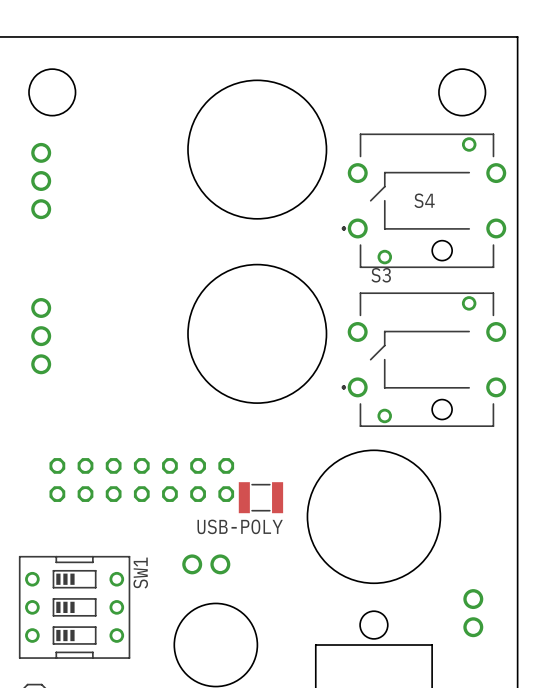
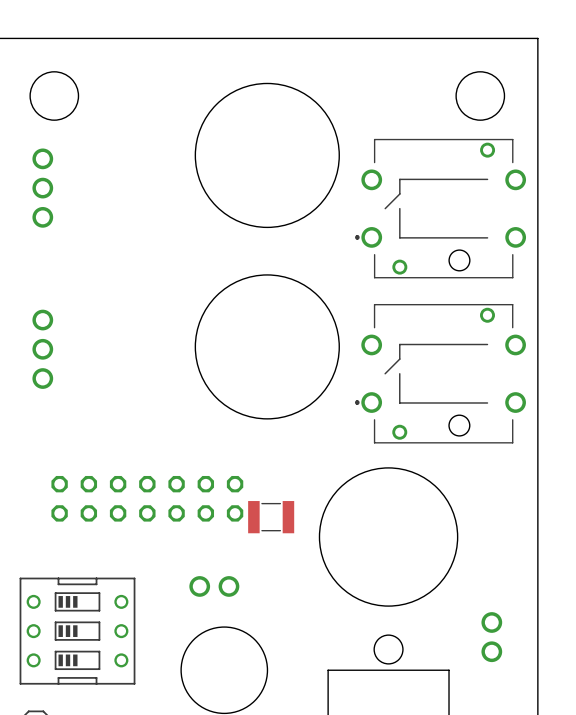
S4 name: S4 (424, 200) -> none
S3 name: S3 (381, 275) -> none
USB-POLY name: USB-POLY (240, 526) -> none
SW1: (74, 607) -> none
part: none -> (77, 631)

